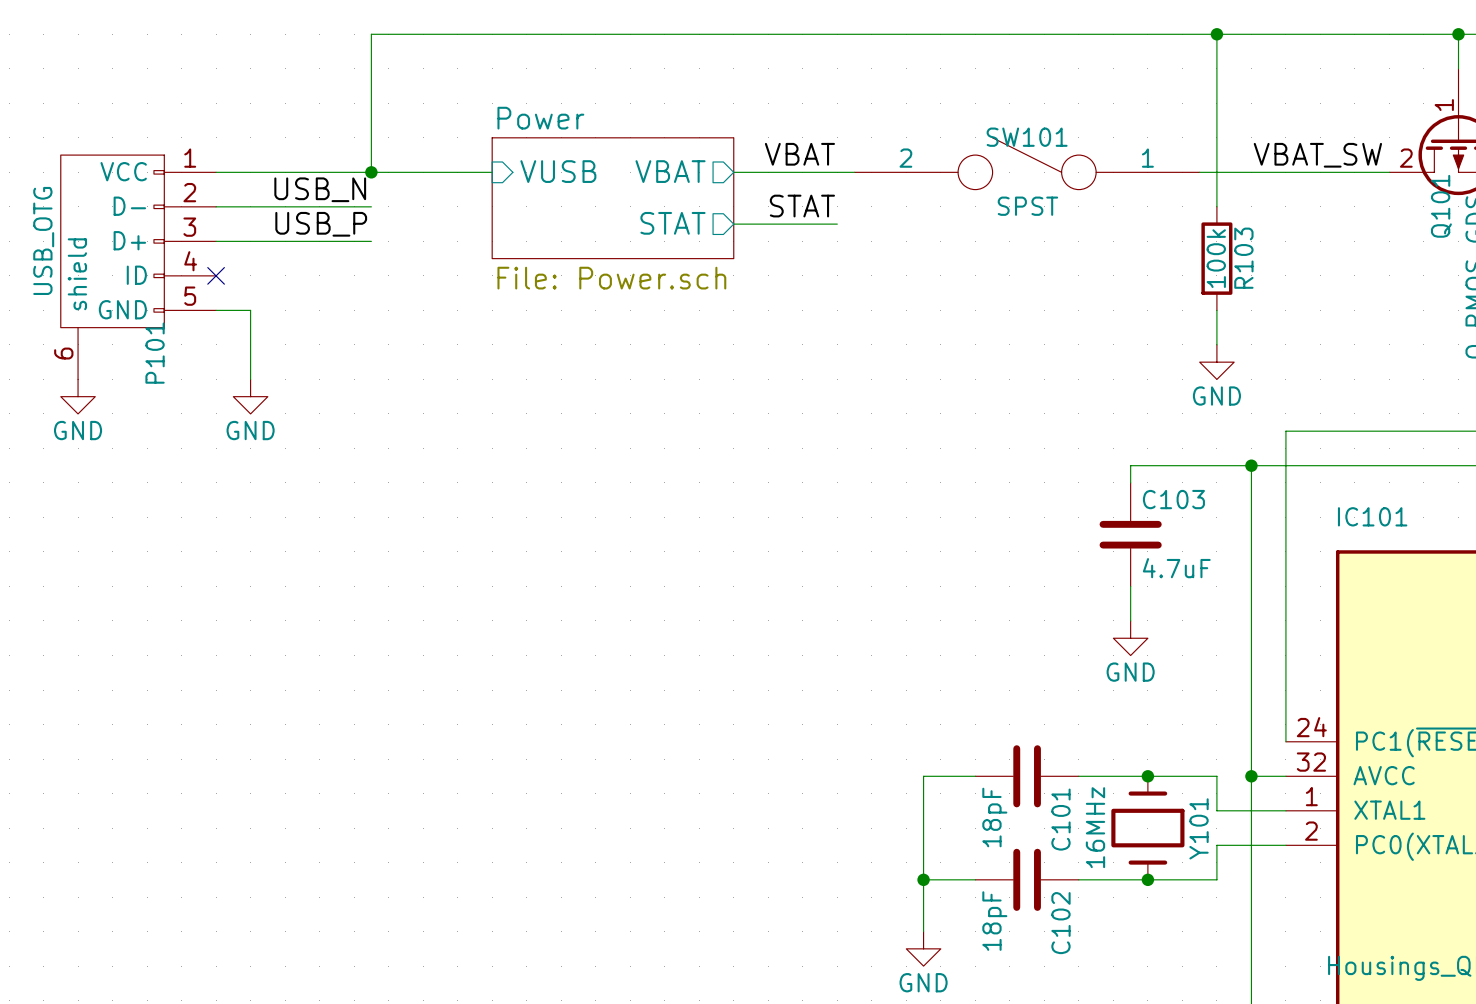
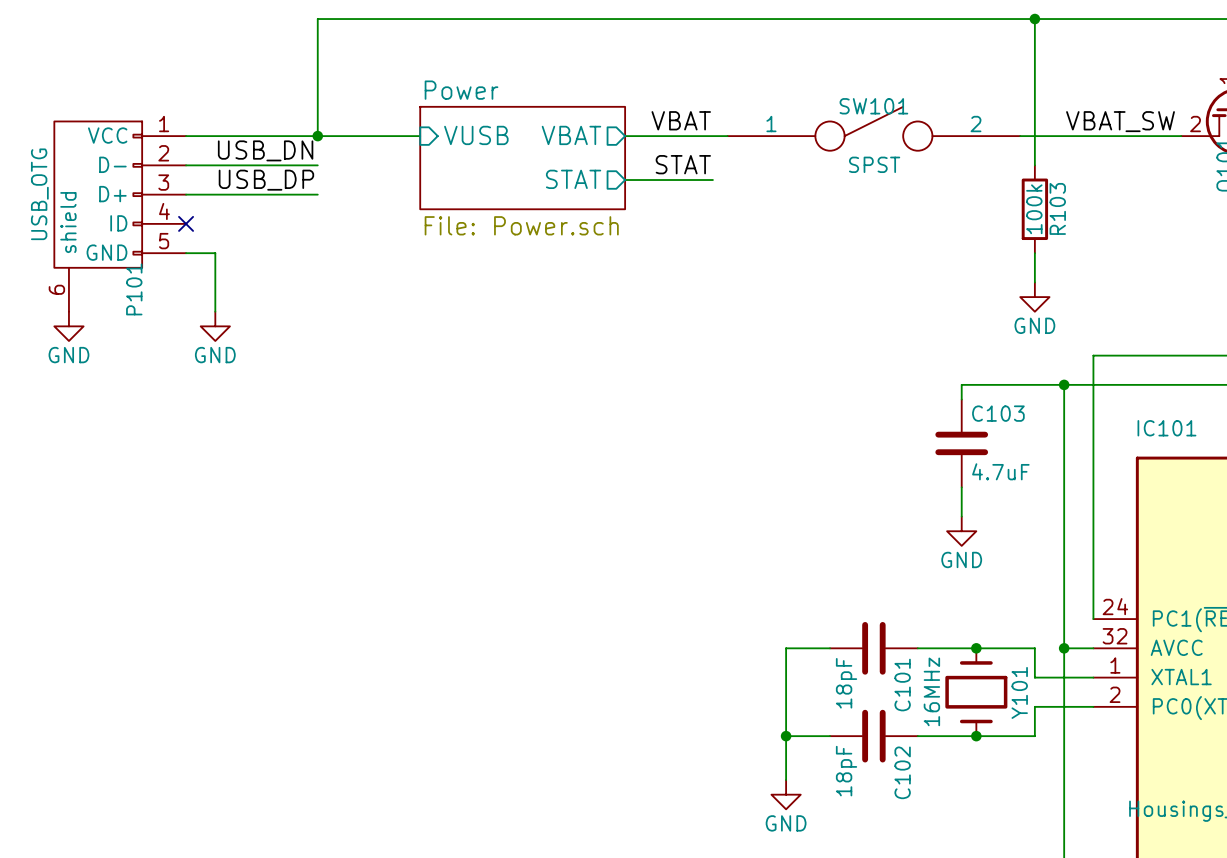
SW101 flip: as is (1027, 163) -> left-right (873, 128)
label: USB_N (320, 189) -> USB_DN (265, 150)
label: USB_P (321, 224) -> USB_DP (266, 180)

